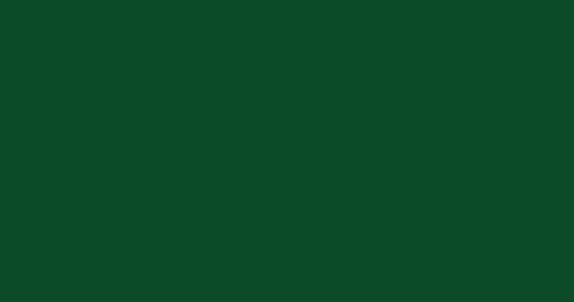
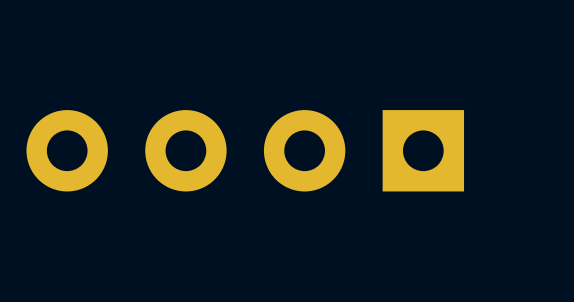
part: none -> (245, 150)

